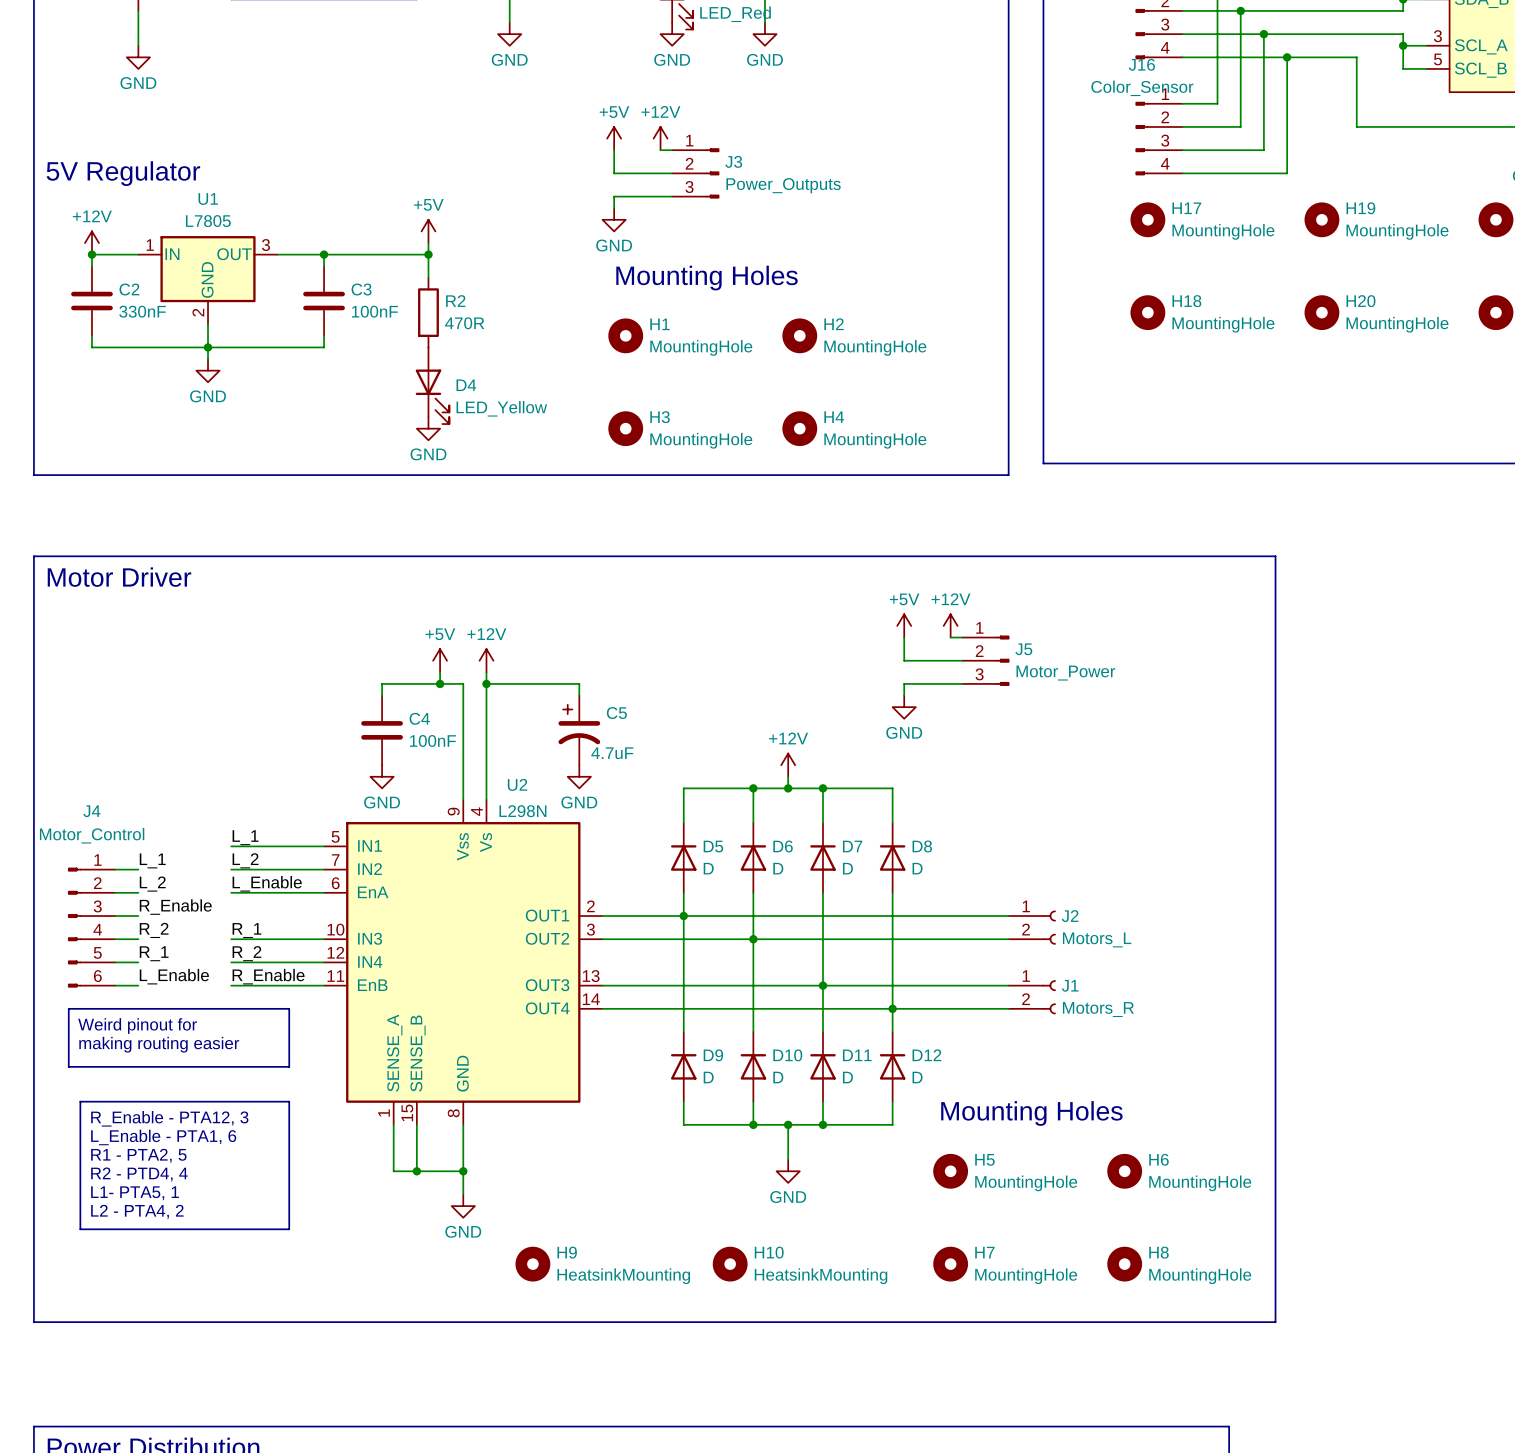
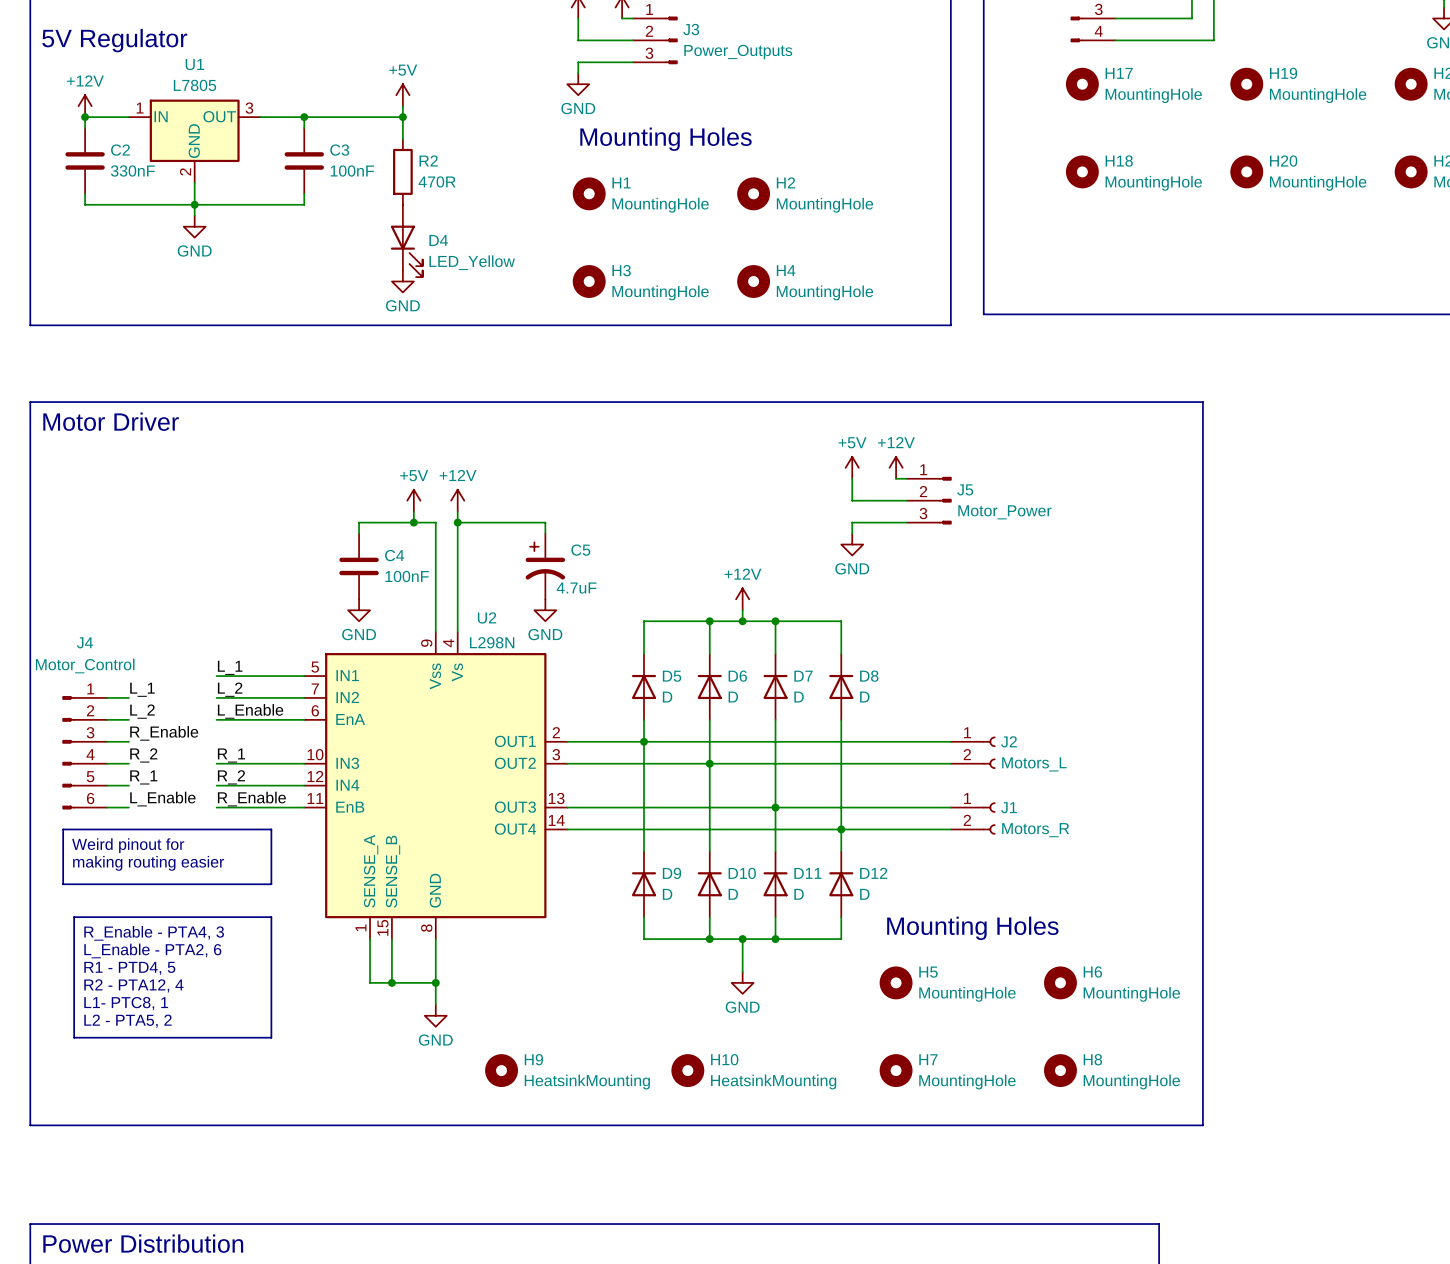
text: R_Enable - PTA12, 3 (169, 1118) -> R_Enable - PTA4, 3 (154, 933)
text: L_Enable - PTA1, 6 (163, 1137) -> L_Enable - PTA2, 6 (152, 950)
text: R1 - PTA2, 5 (138, 1155) -> R1 - PTD4, 5 (129, 968)
text: R2 - PTD4, 4 (139, 1174) -> R2 - PTA12, 4 (133, 985)
text: L1- PTA5, 1 (135, 1193) -> L1- PTC8, 1 (126, 1003)
text: L2 - PTA4, 2 (137, 1211) -> L2 - PTA5, 2 (127, 1021)

